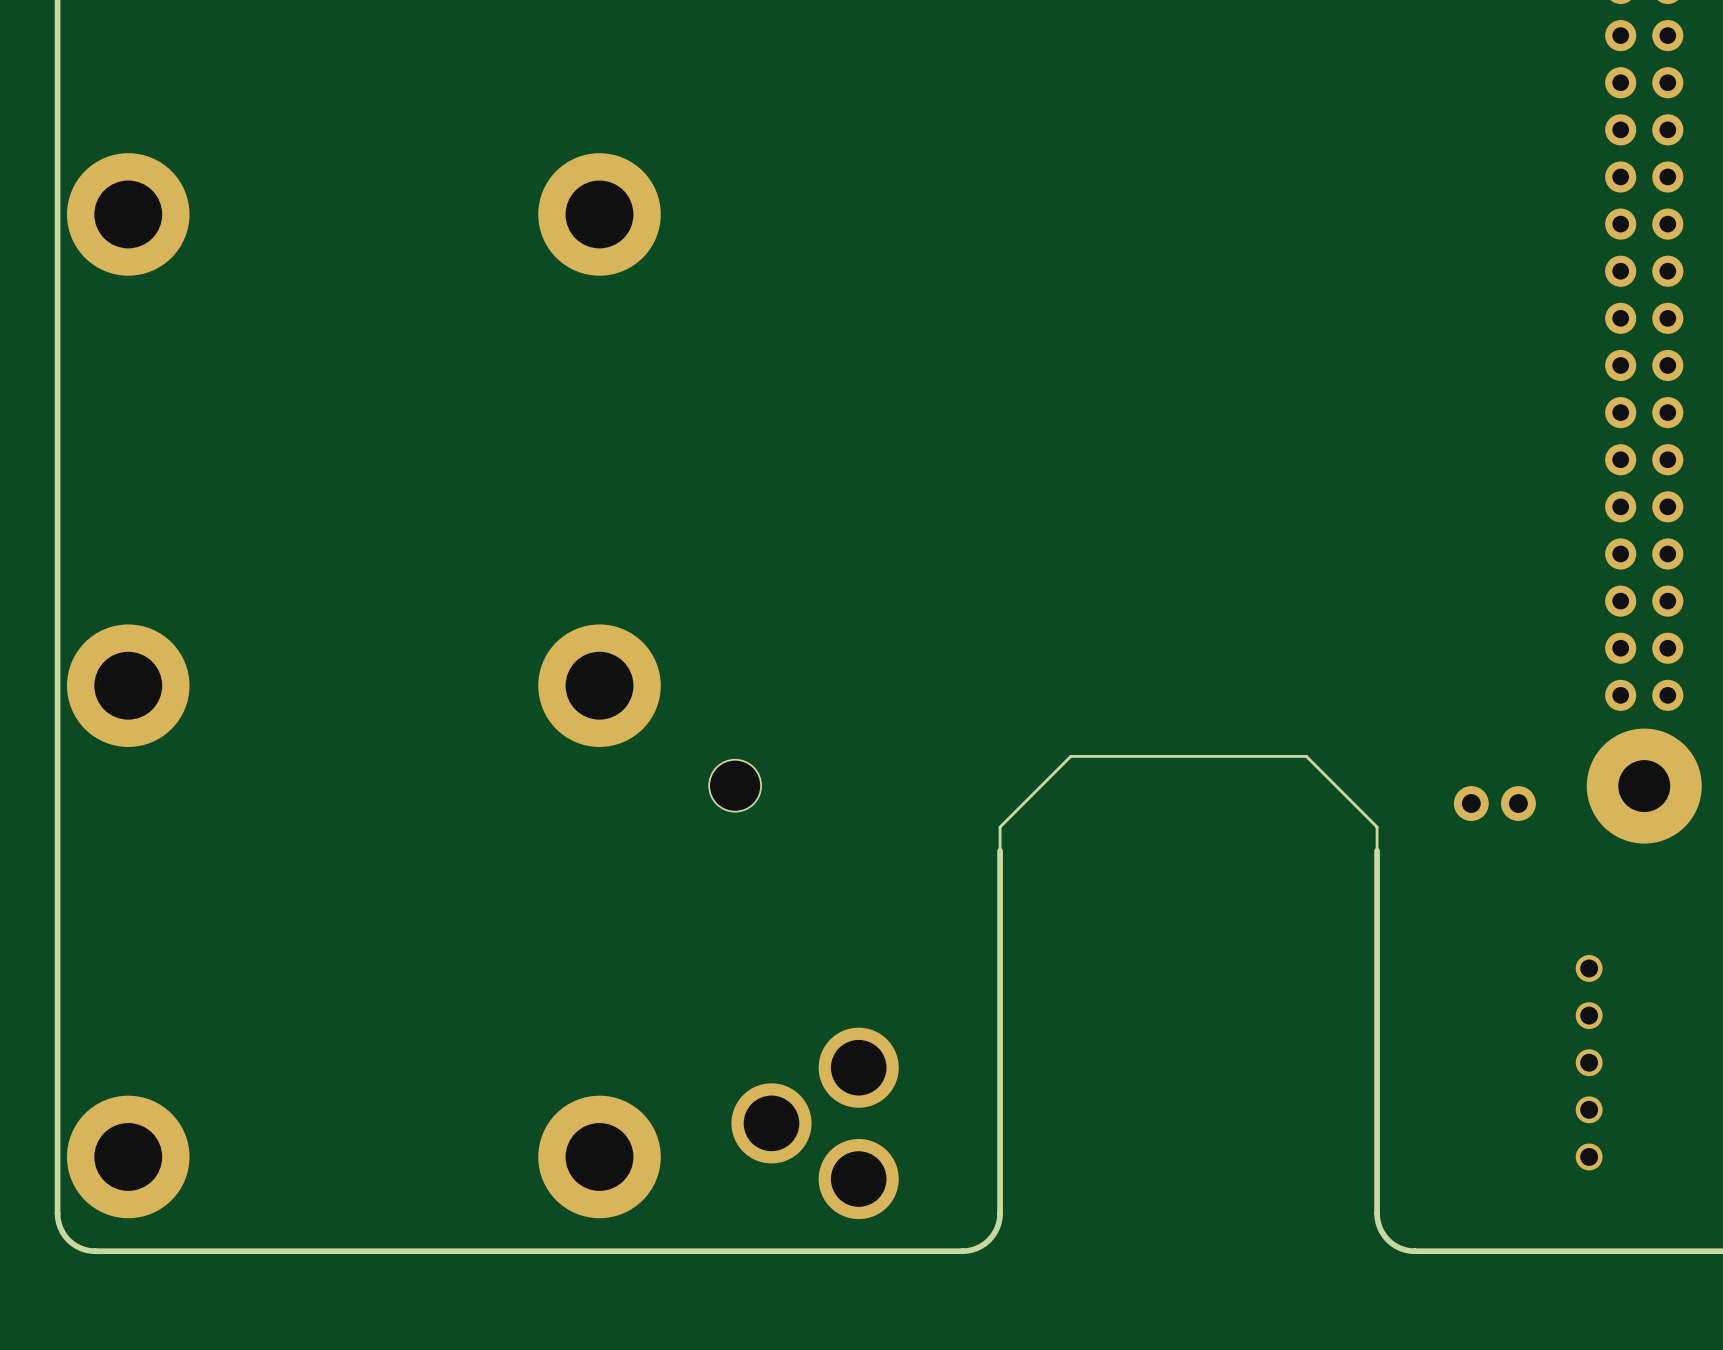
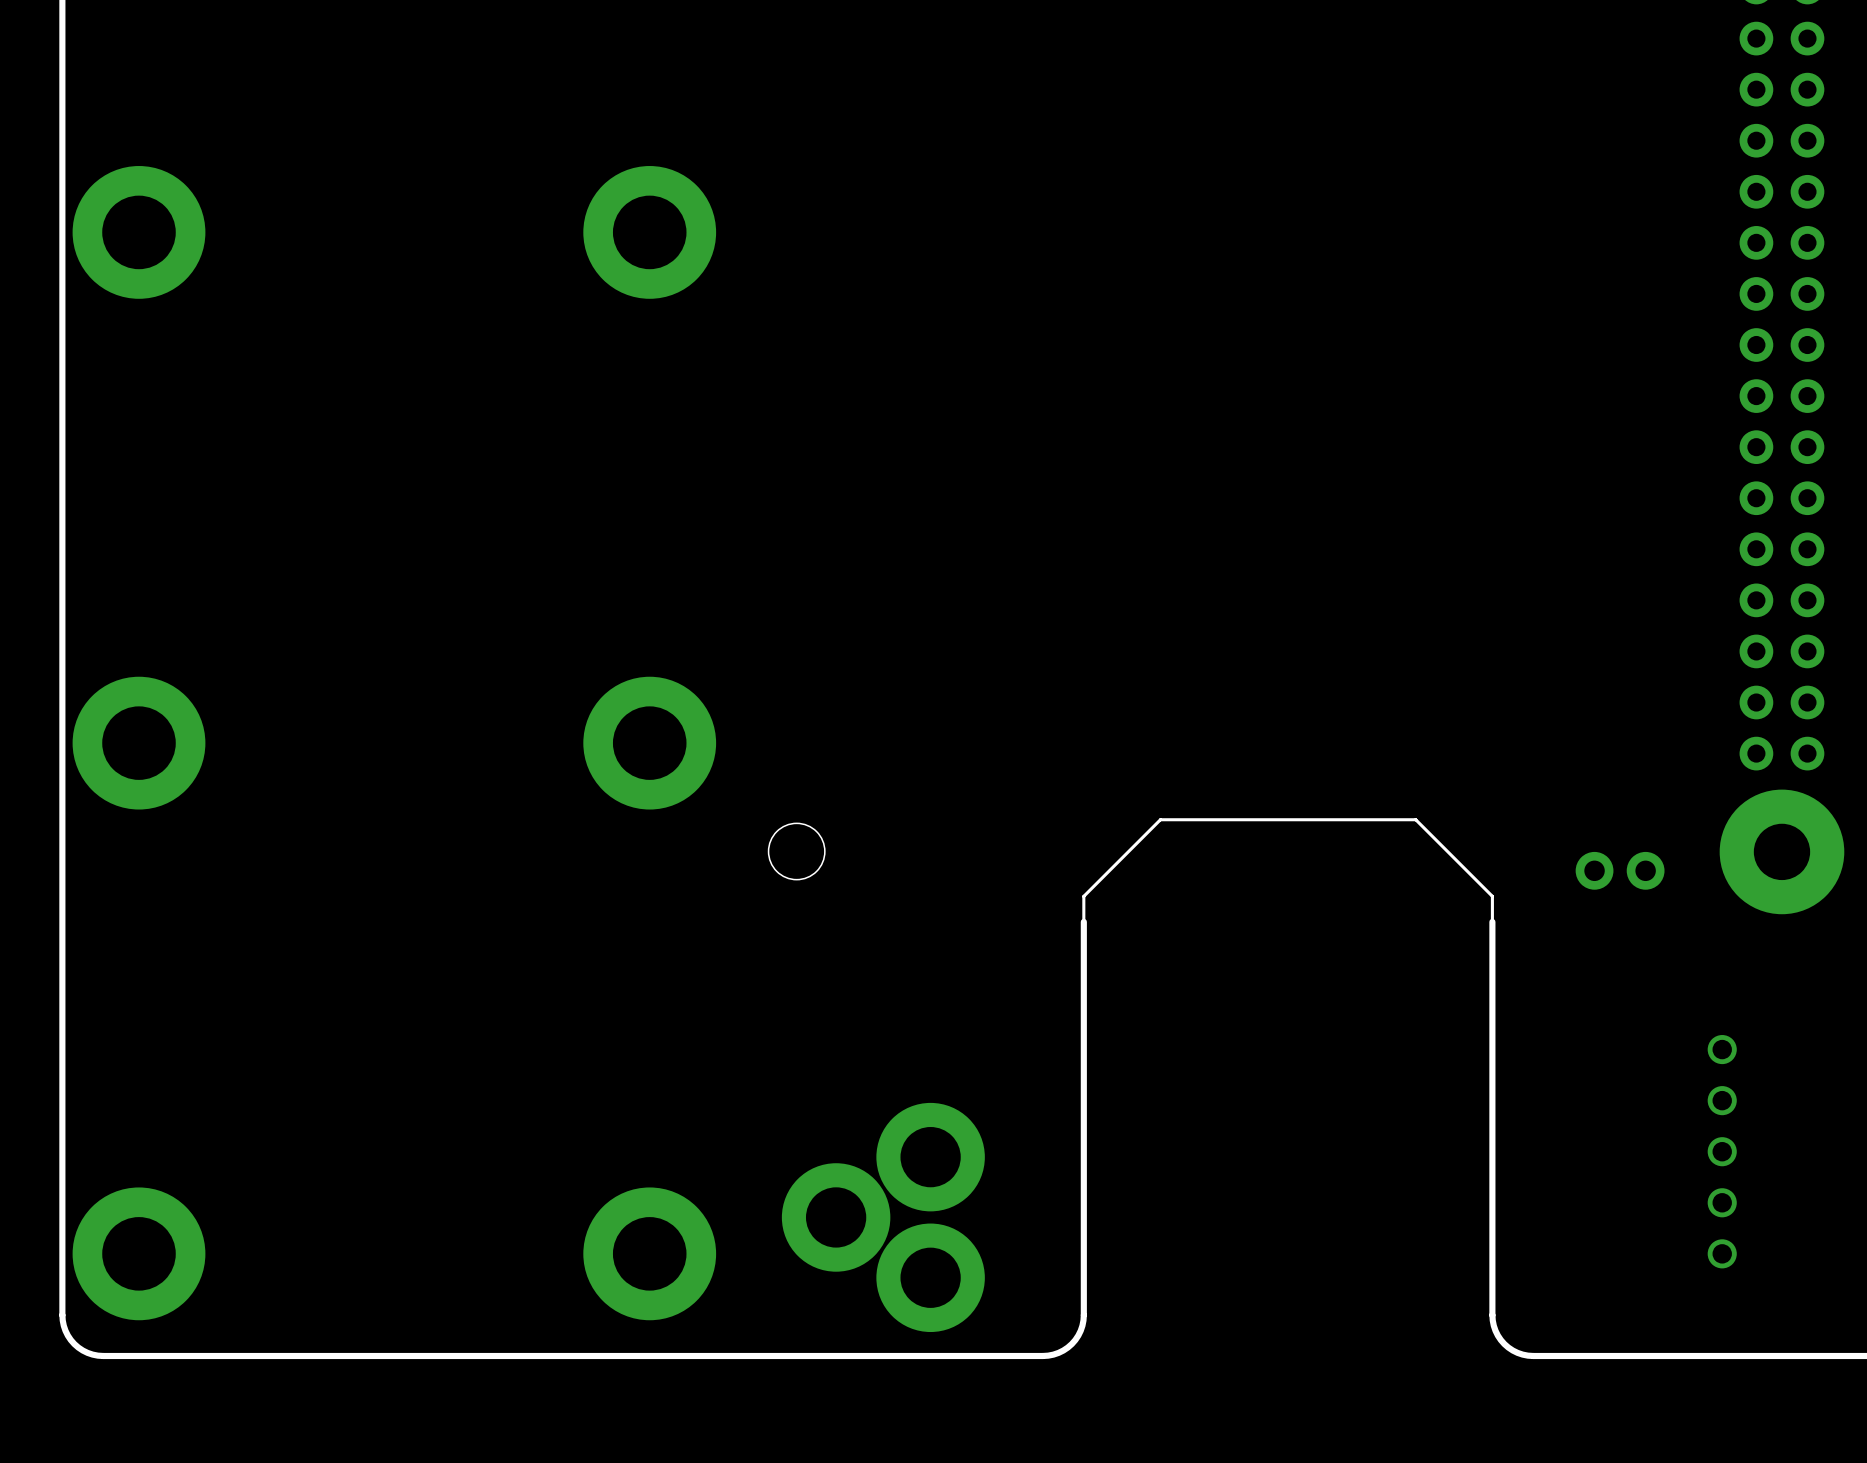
part footprint: [731, 1027, 899, 1220] -> [781, 1102, 985, 1333]

